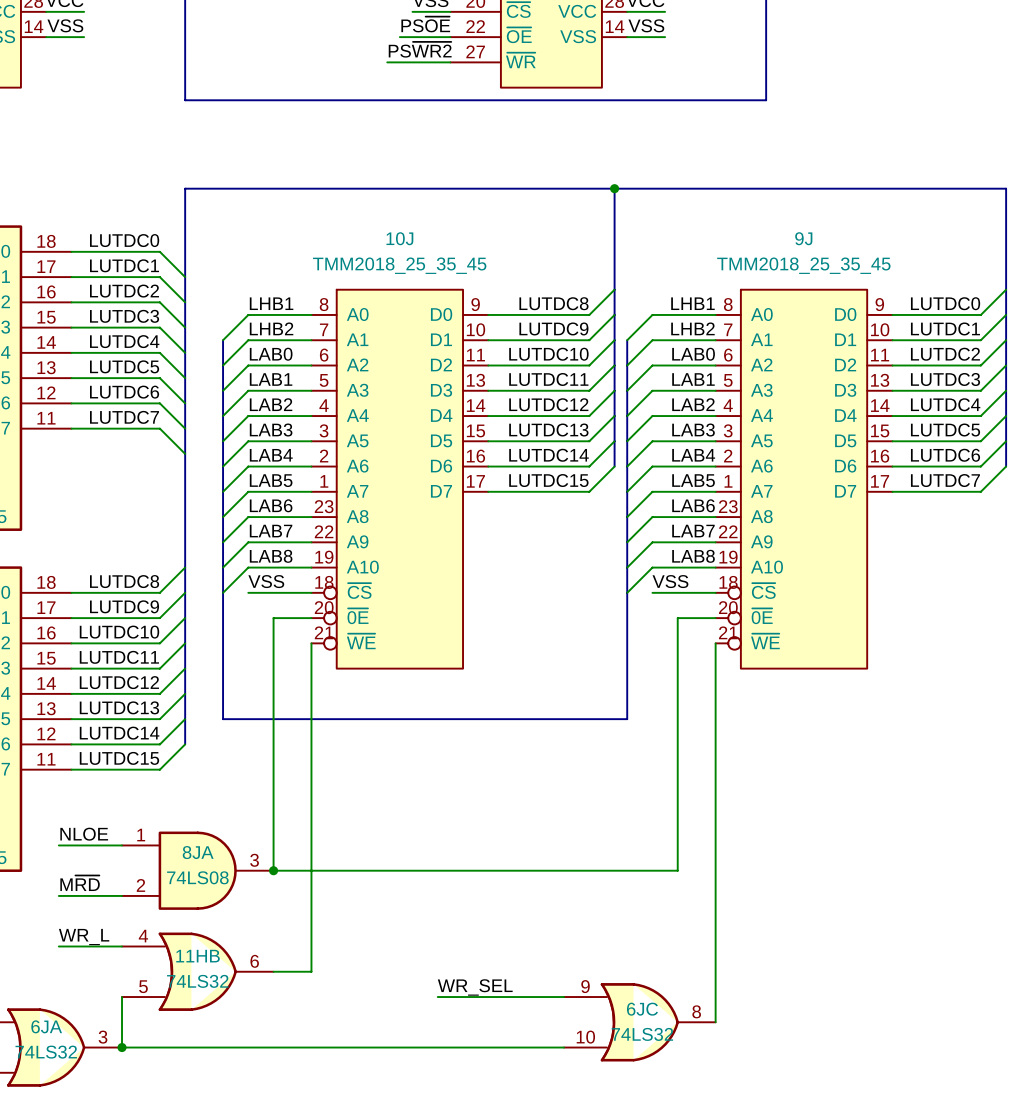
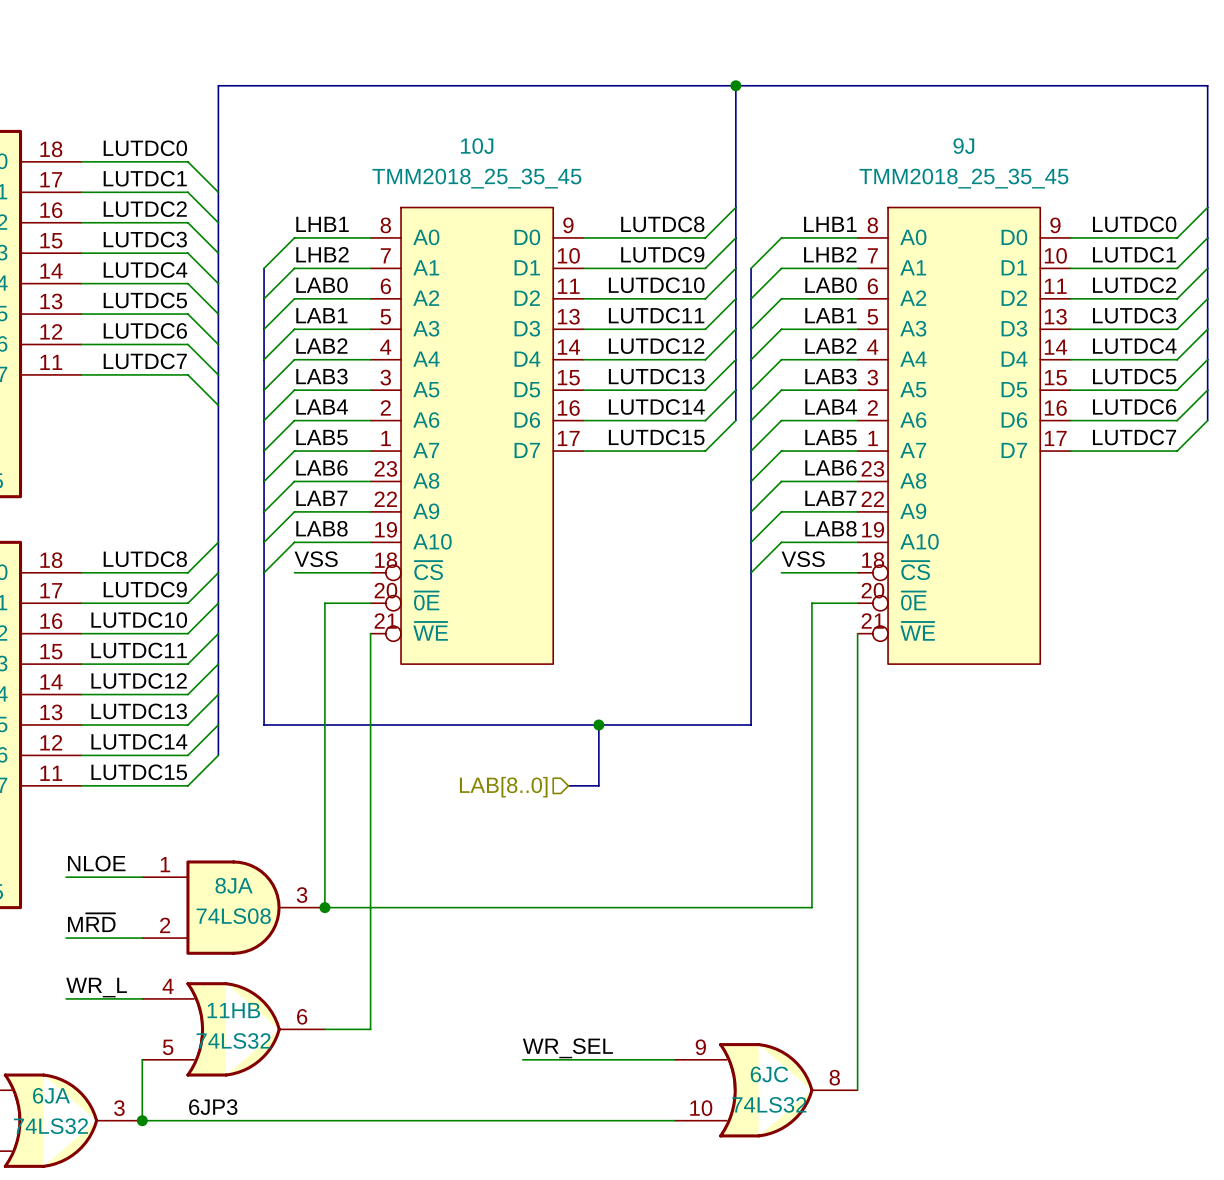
bus: none -> (598, 724) (598, 785) (568, 785)
junction: none -> (598, 724)
hierarchical label: none -> LAB[8..0] (503, 787)
label: none -> 6JP3 (213, 1107)

